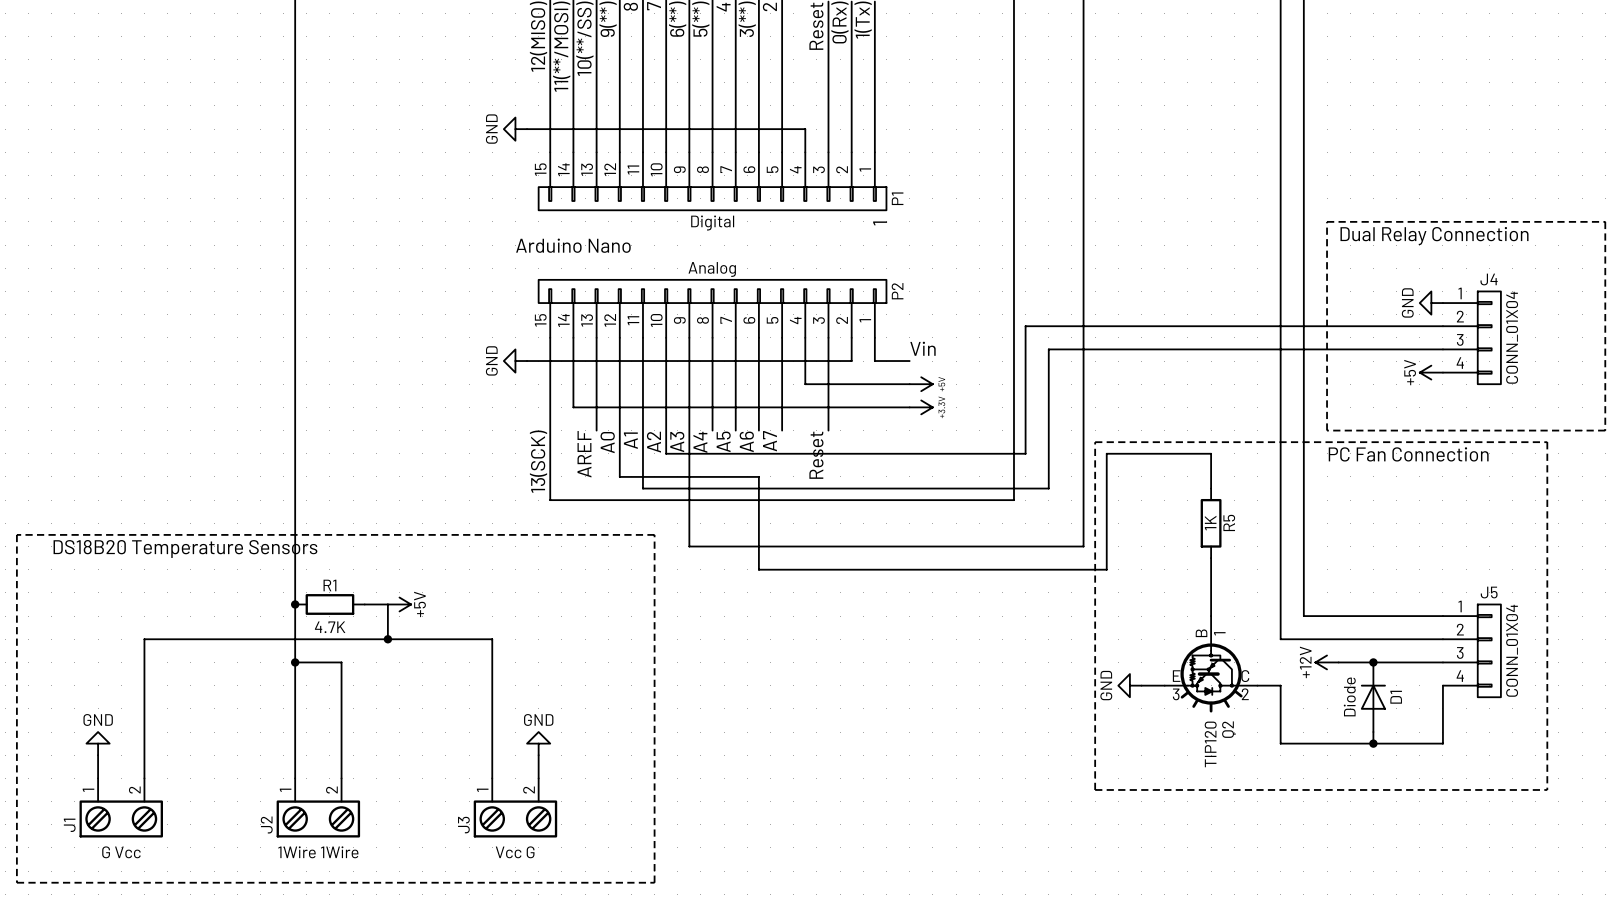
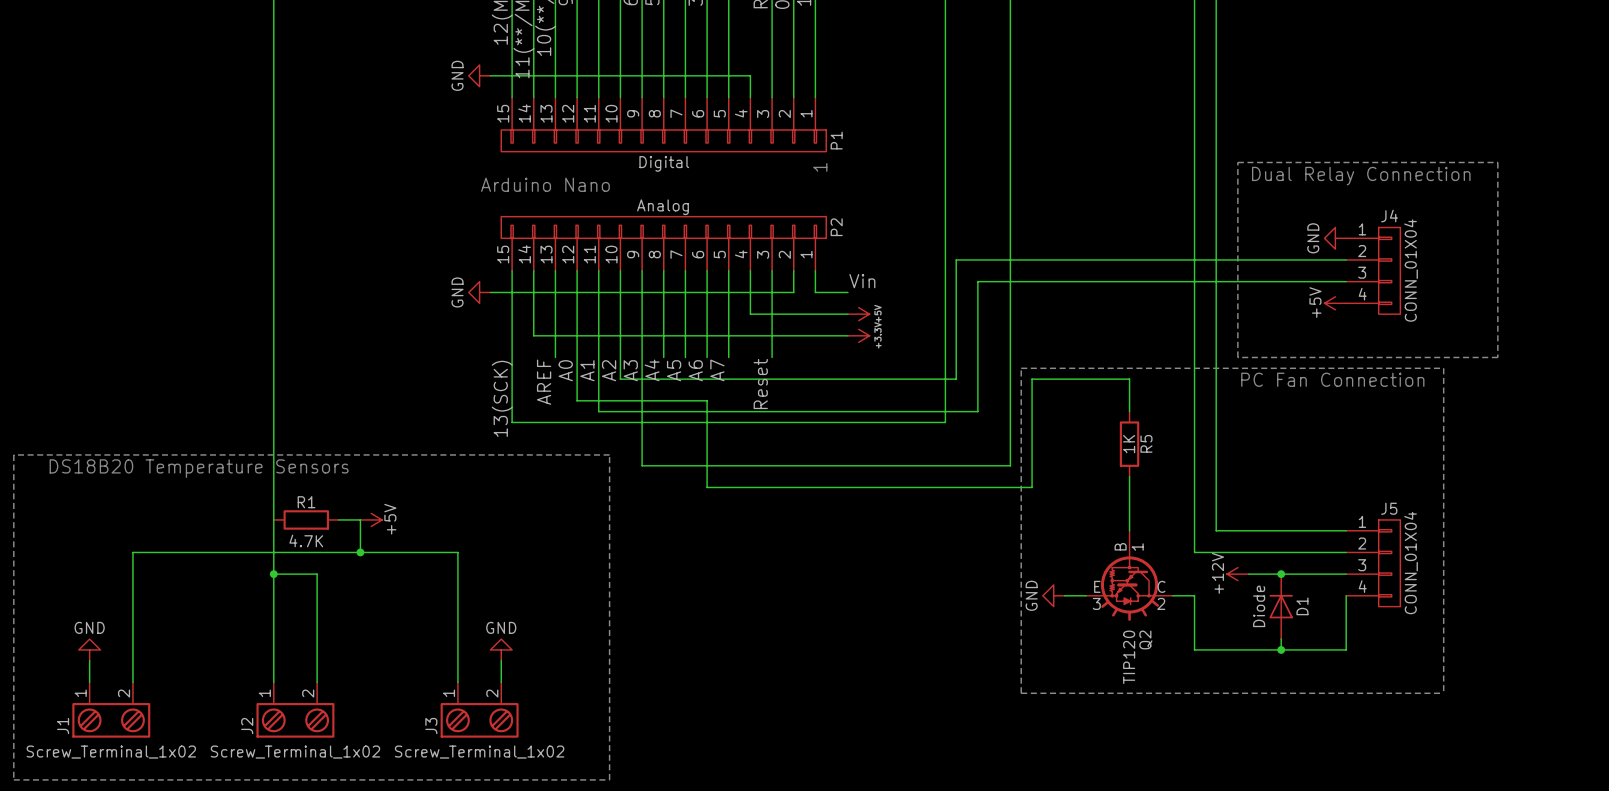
junction: (295, 604) -> none
J1 value: G Vcc (121, 852) -> Screw_Terminal_1x02 (111, 752)
J2 value: 1Wire 1Wire (318, 852) -> Screw_Terminal_1x02 (295, 752)
J3 value: Vcc G (515, 852) -> Screw_Terminal_1x02 (479, 752)

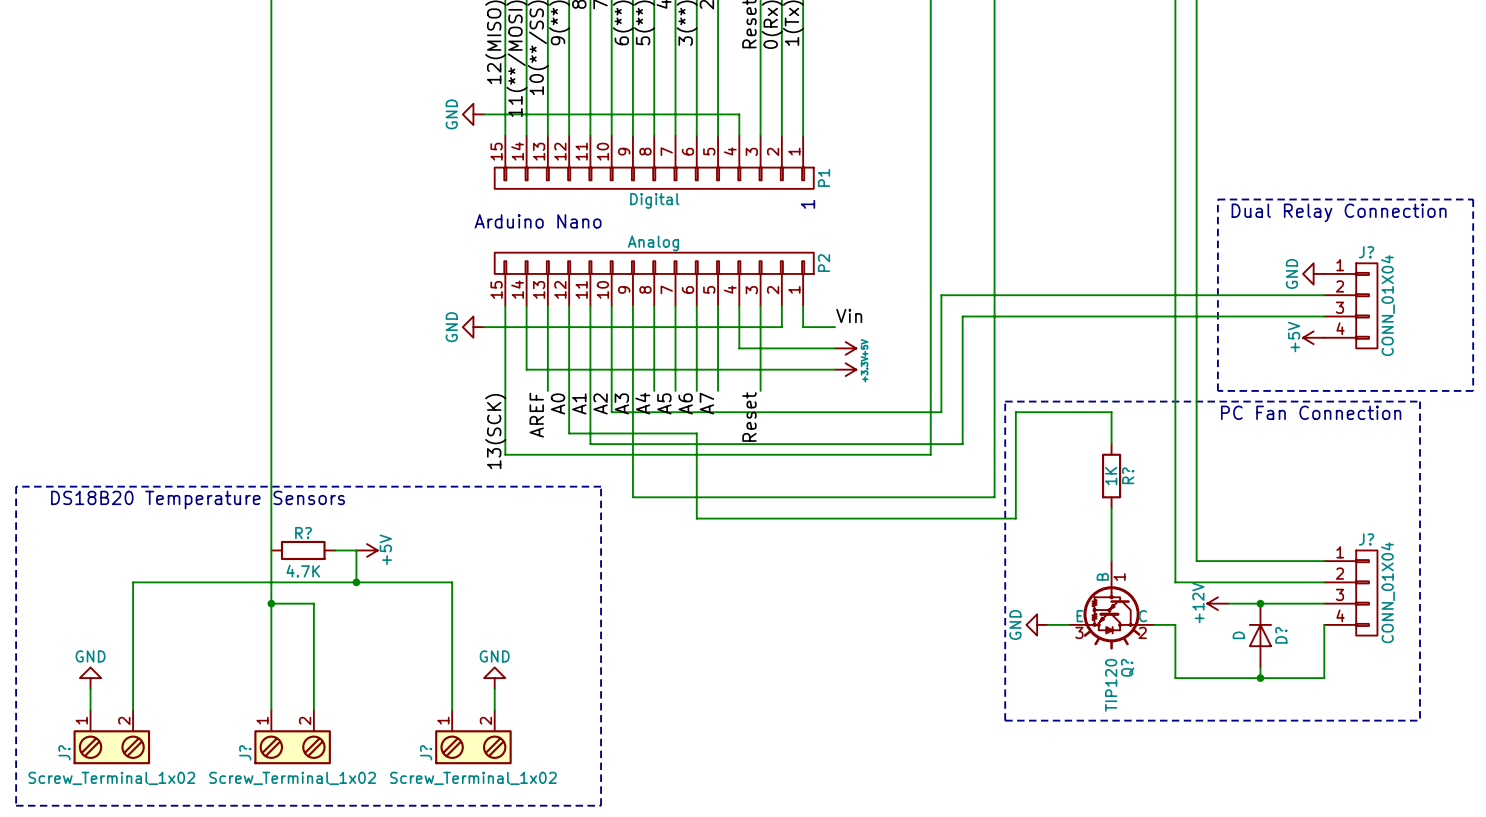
J4 name: J4 (1389, 215) -> J? (1366, 252)
R5 name: R5 (1146, 443) -> R? (1128, 475)
R1 name: R1 (306, 502) -> R? (303, 533)
J5 name: J5 (1389, 508) -> J? (1366, 539)
D1 value: Diode (1259, 606) -> D (1238, 635)
D1 name: D1 (1302, 606) -> D? (1281, 635)
Q2 name: Q2 (1145, 639) -> Q? (1127, 667)
J1 name: J1 (63, 726) -> J? (64, 752)
J2 name: J2 (247, 726) -> J? (245, 752)
J3 name: J3 (431, 726) -> J? (426, 752)

